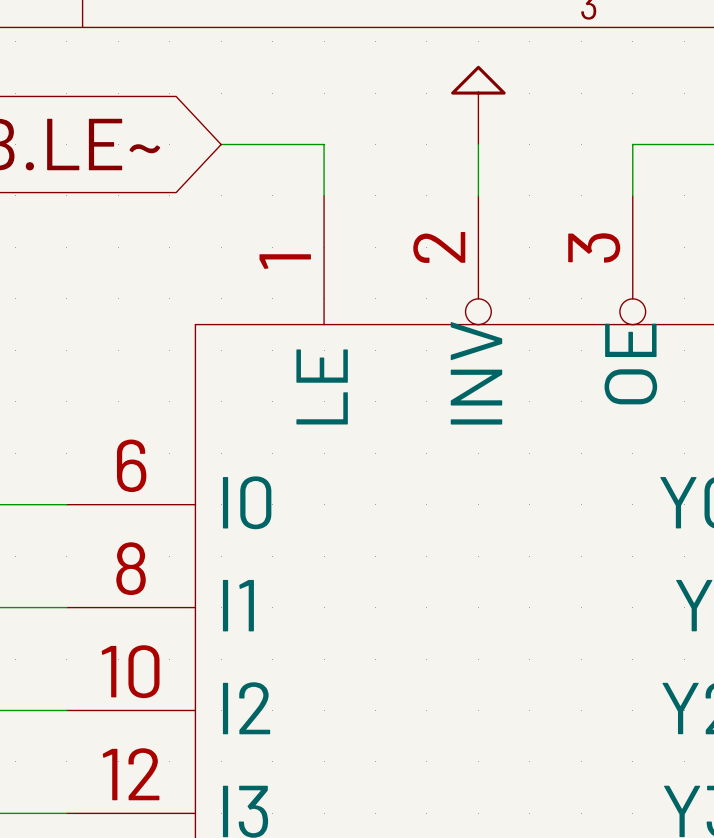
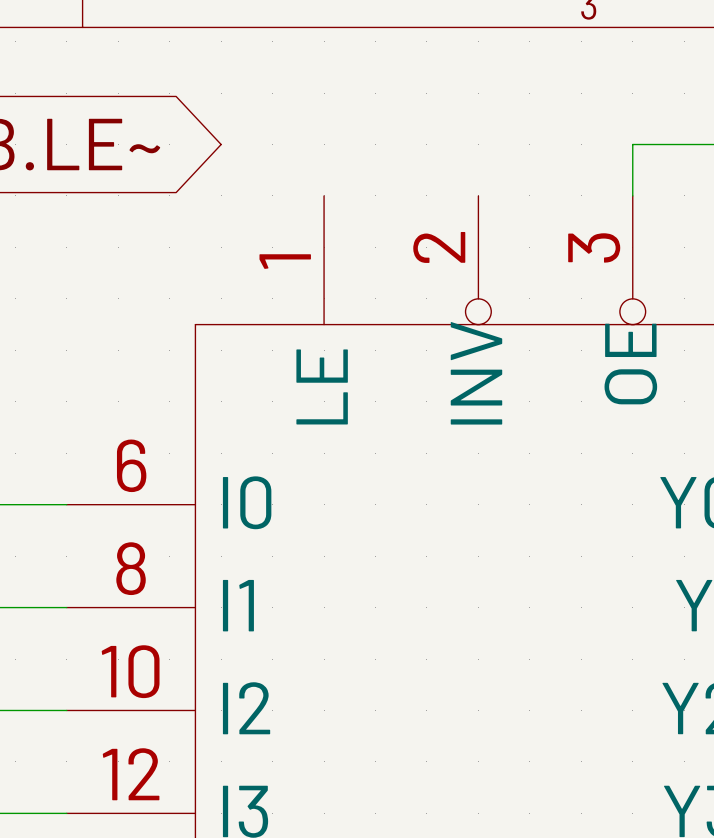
power symbol: (478, 105) -> none
wire: (221, 144) (324, 144) (324, 195) -> none
wire: (478, 144) (478, 195) -> none

